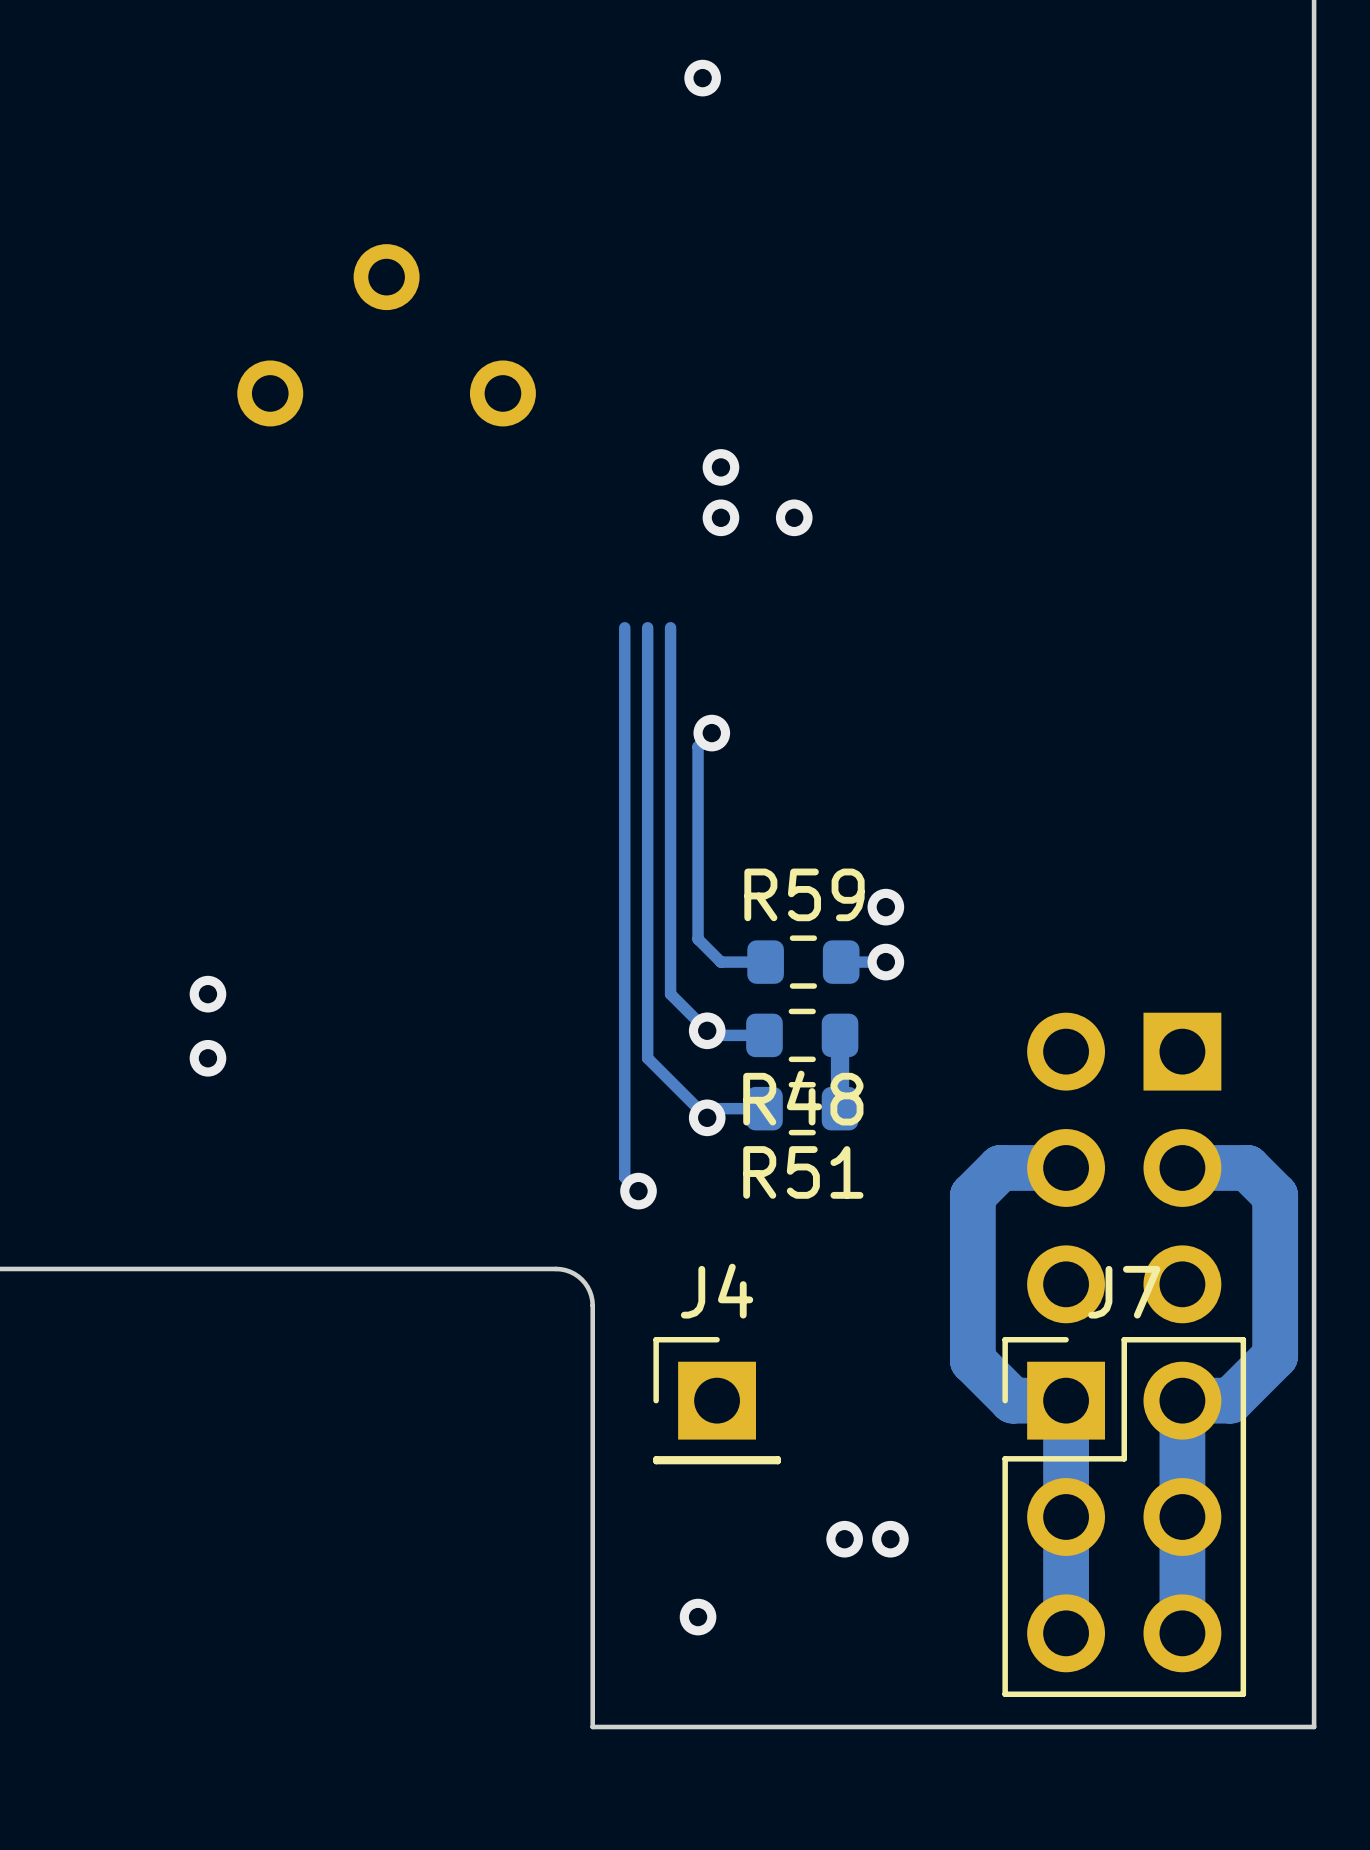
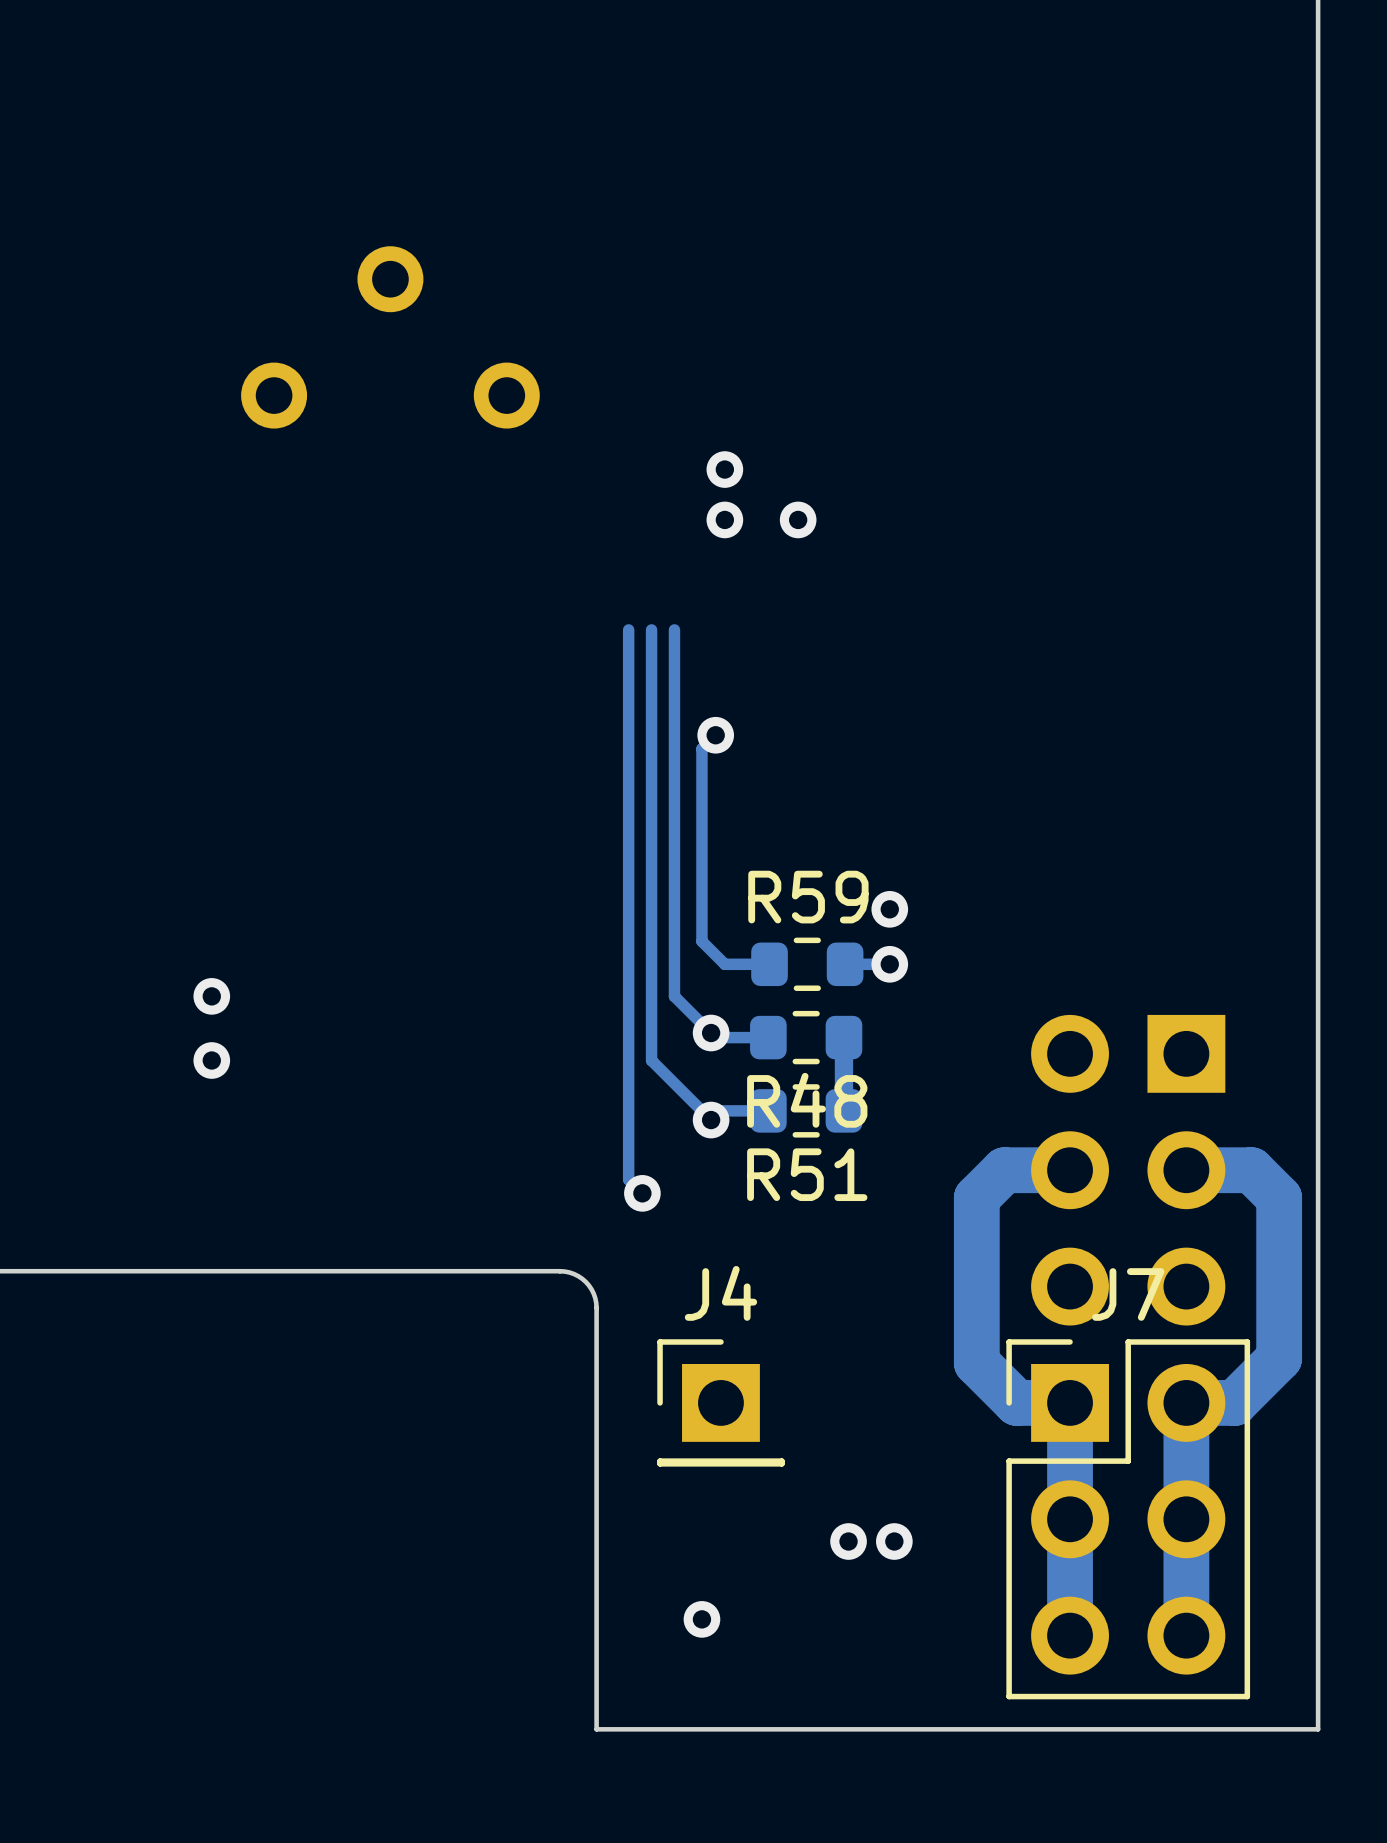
via: (702, 78) -> none

